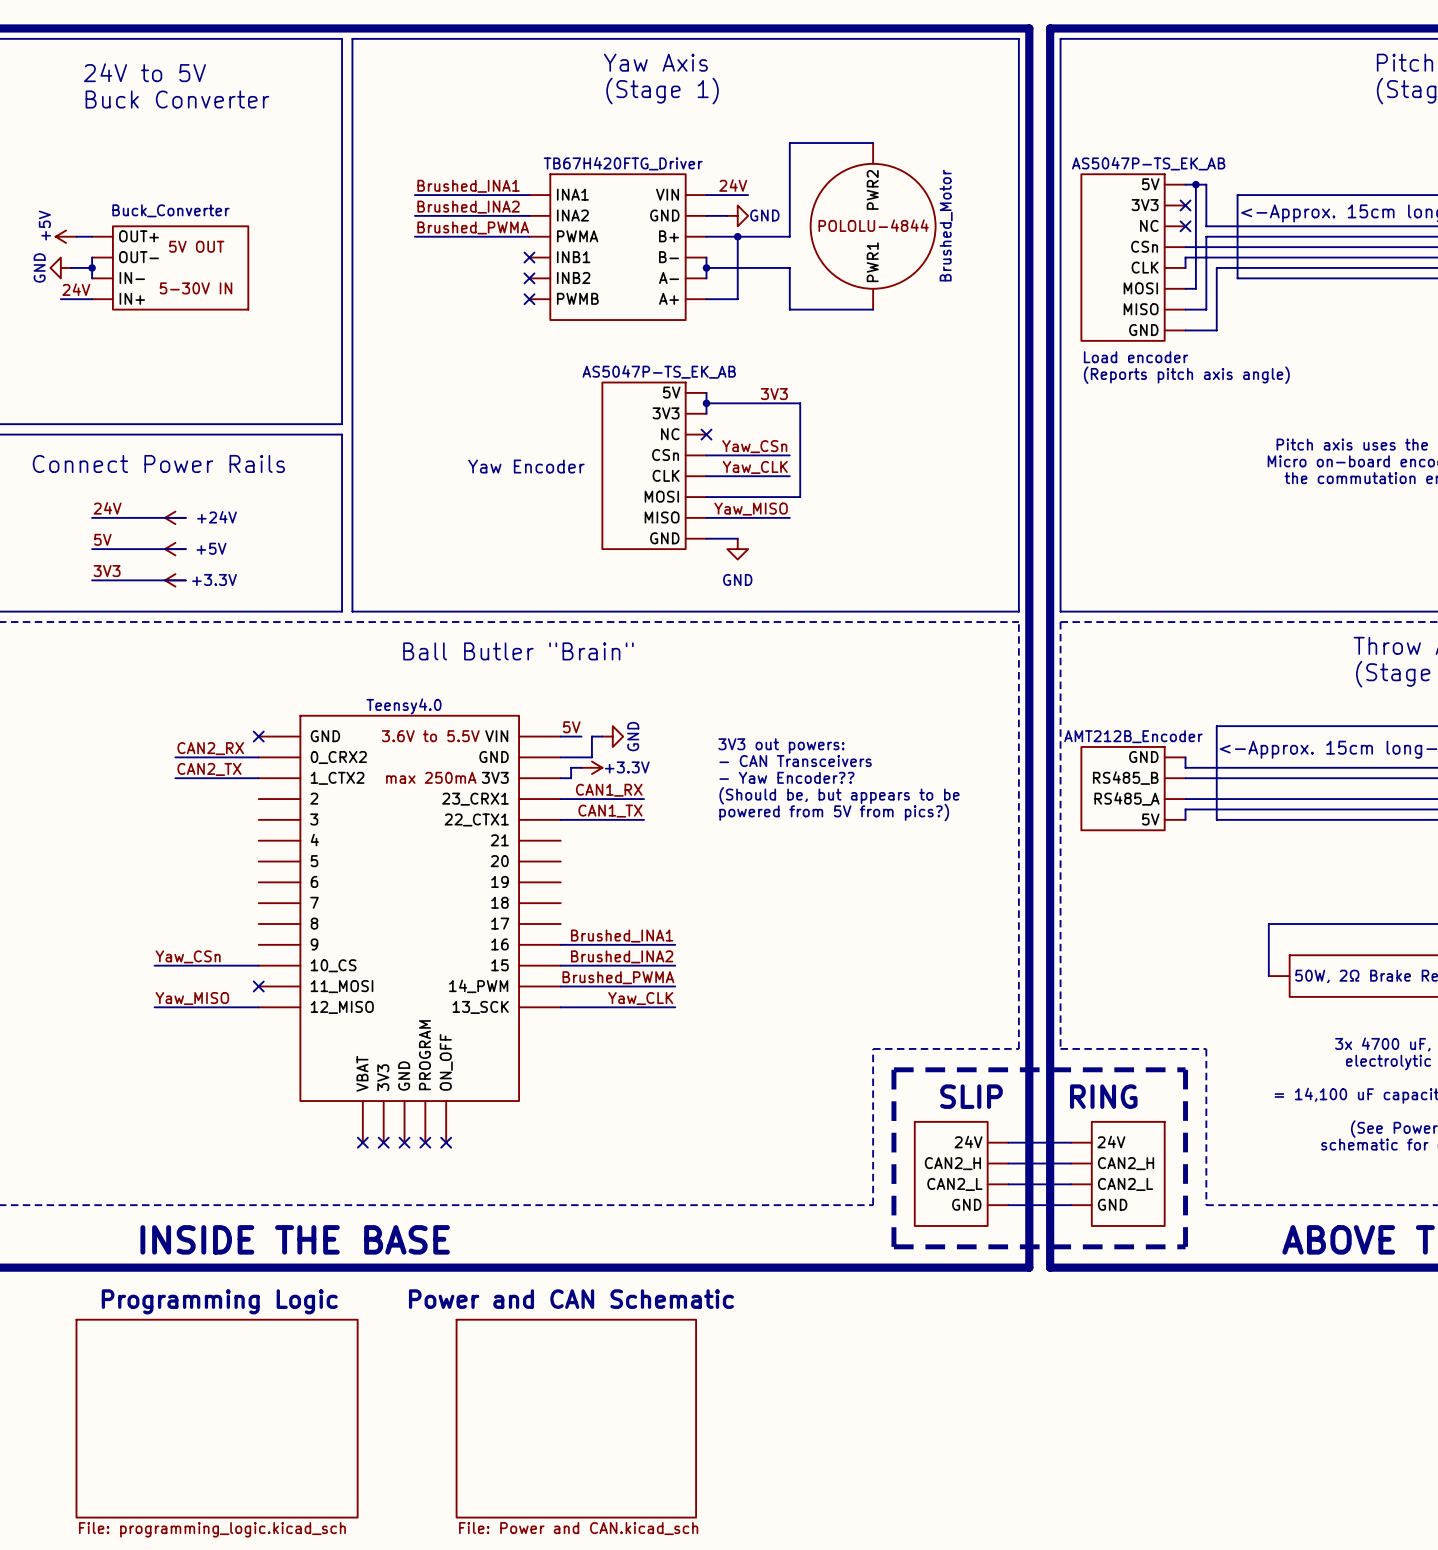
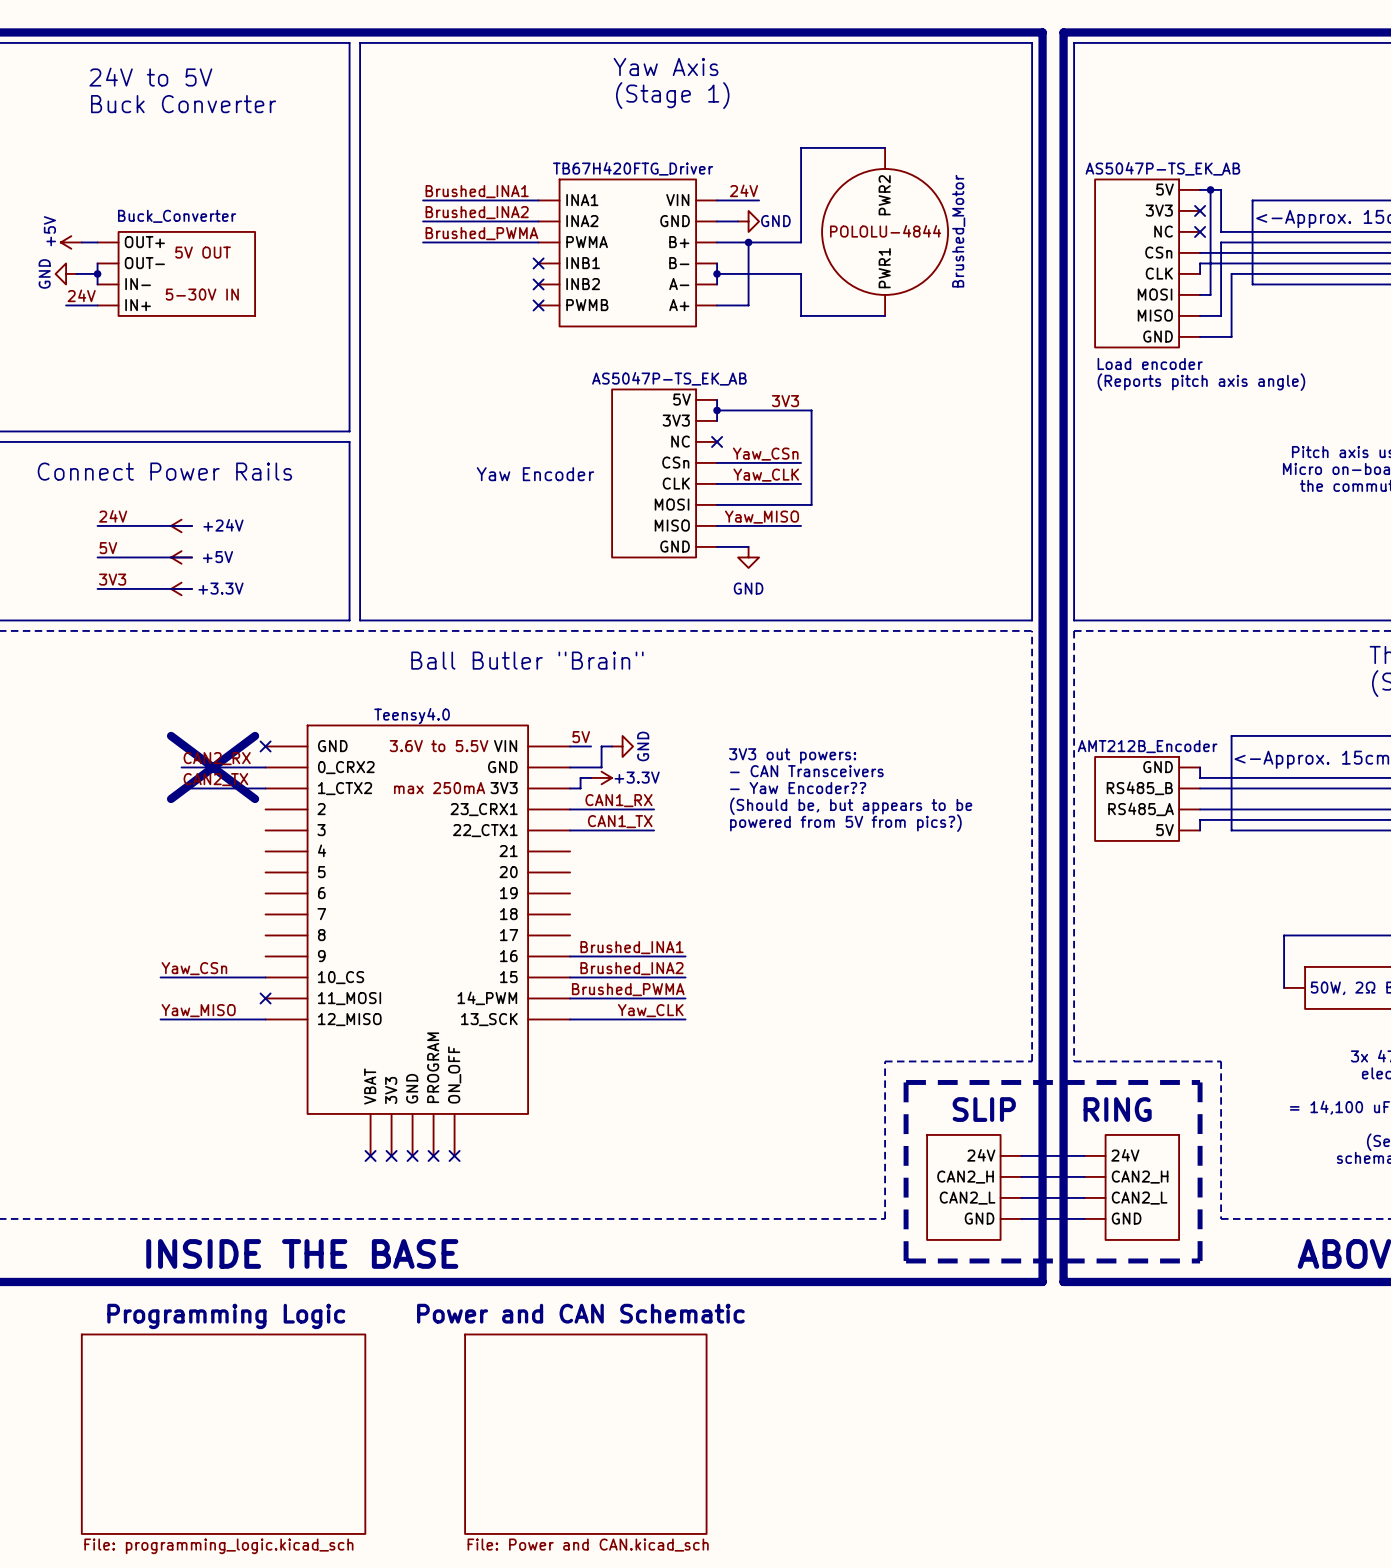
line: none -> (171, 735) (255, 798)
line: none -> (255, 735) (171, 798)

